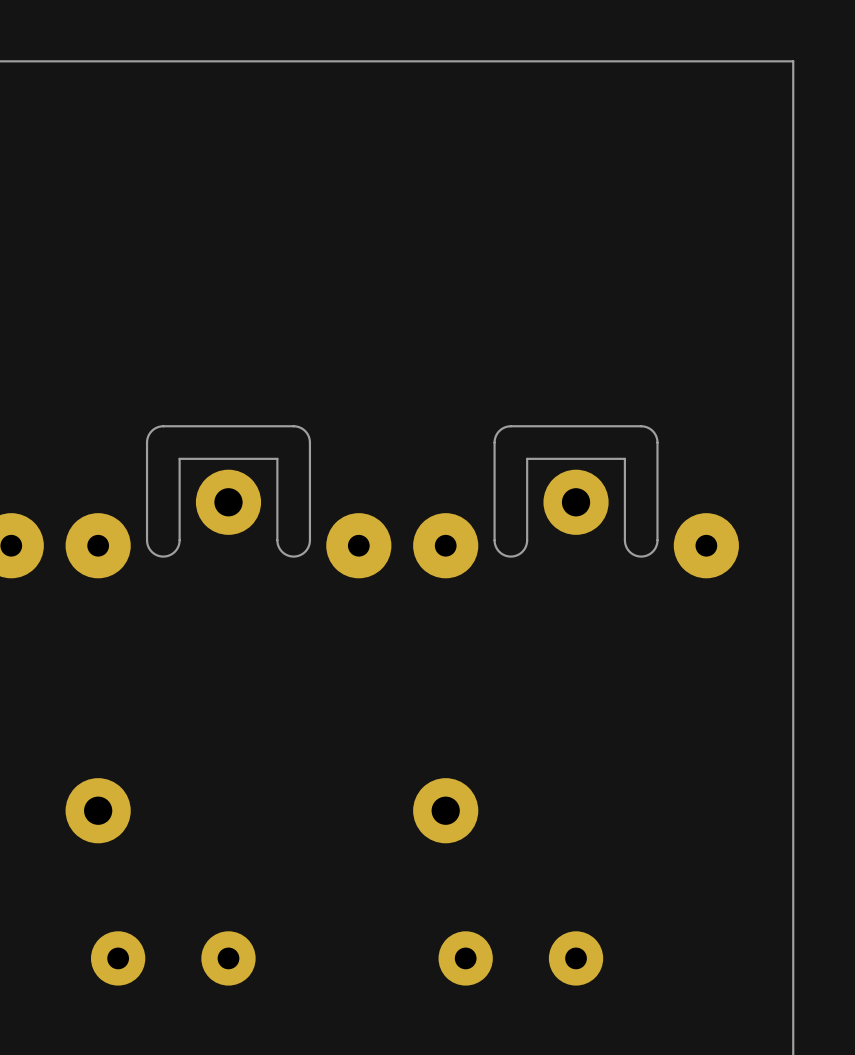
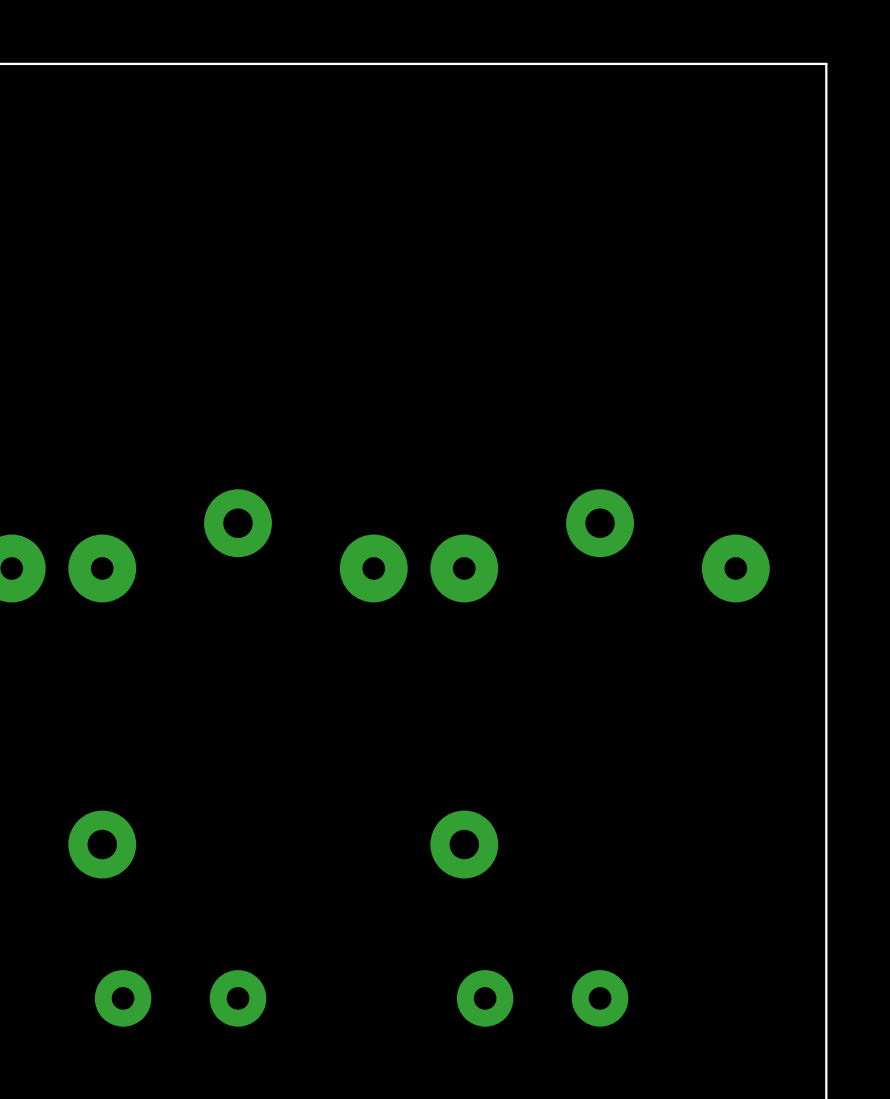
board edge: (293, 426) (163, 426) (153, 429) (149, 434) (147, 442) (147, 540) (150, 550) (157, 555) (165, 556) (174, 551) (179, 544) (179, 458) (277, 458) (277, 544) (282, 551) (287, 555) (295, 556) (303, 553) (307, 548) (309, 540) (309, 440) (303, 429) (293, 426) -> none
board edge: (641, 426) (510, 426) (500, 429) (496, 434) (494, 442) (494, 540) (497, 550) (504, 555) (512, 556) (522, 551) (526, 544) (527, 458) (624, 458) (625, 544) (629, 551) (634, 555) (643, 556) (651, 553) (655, 548) (657, 540) (657, 440) (651, 429) (641, 426) -> none

